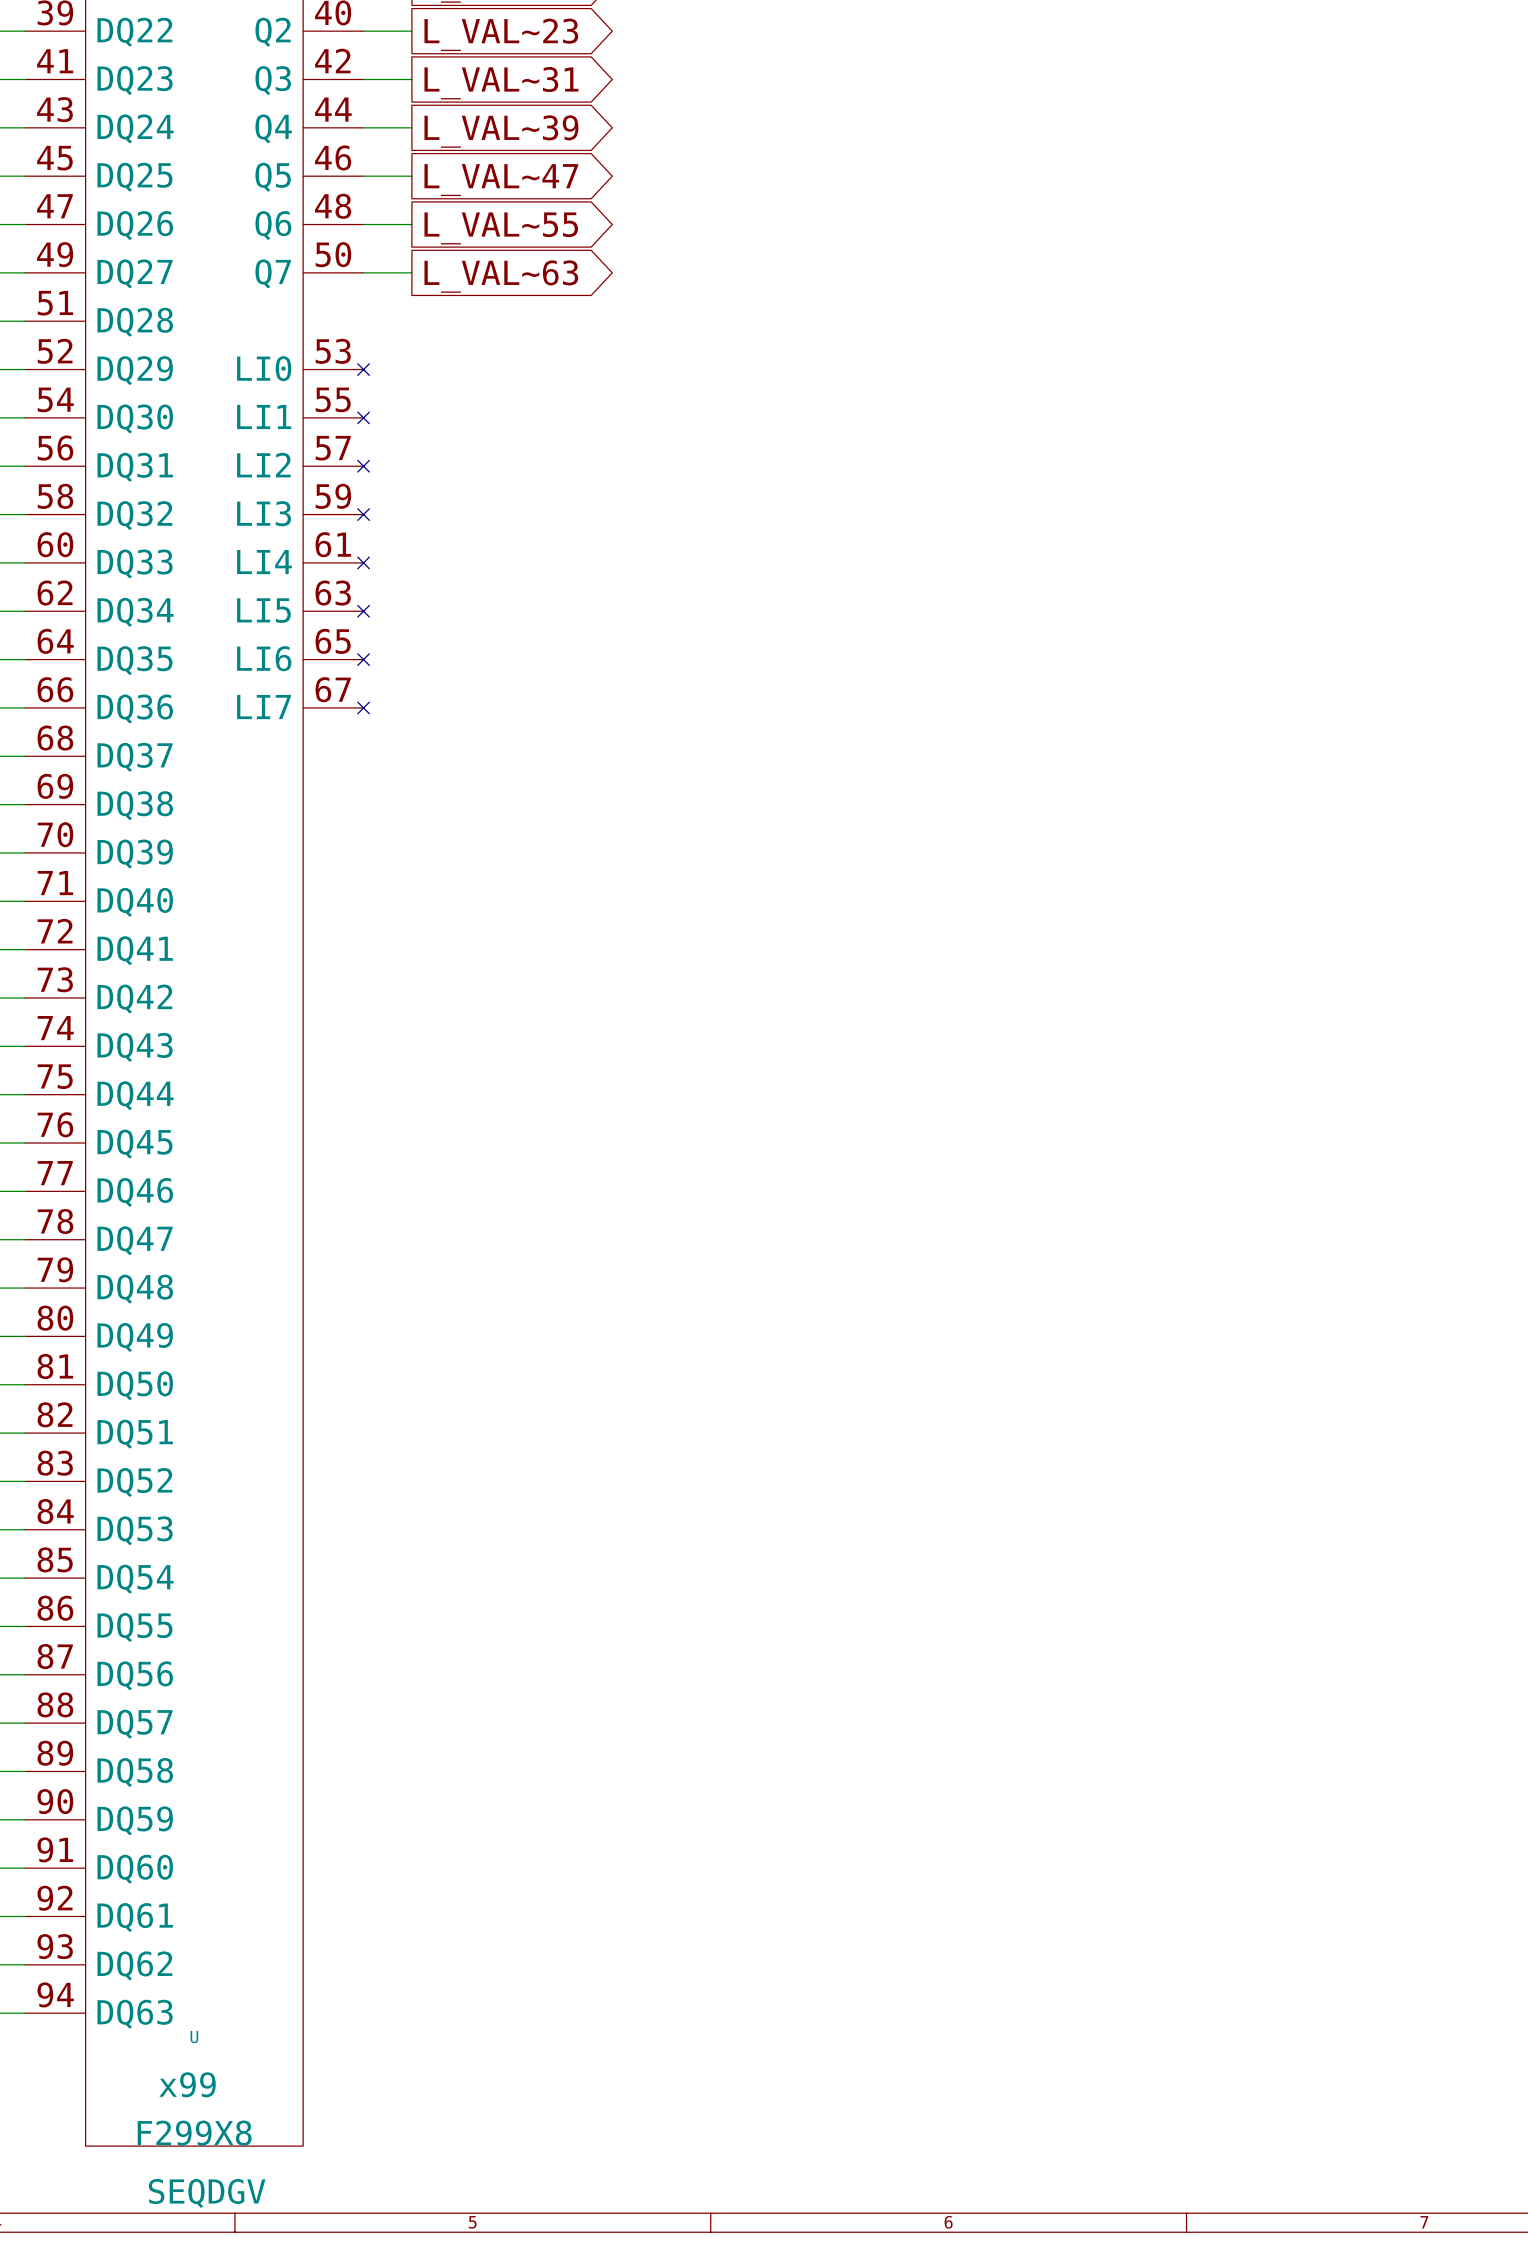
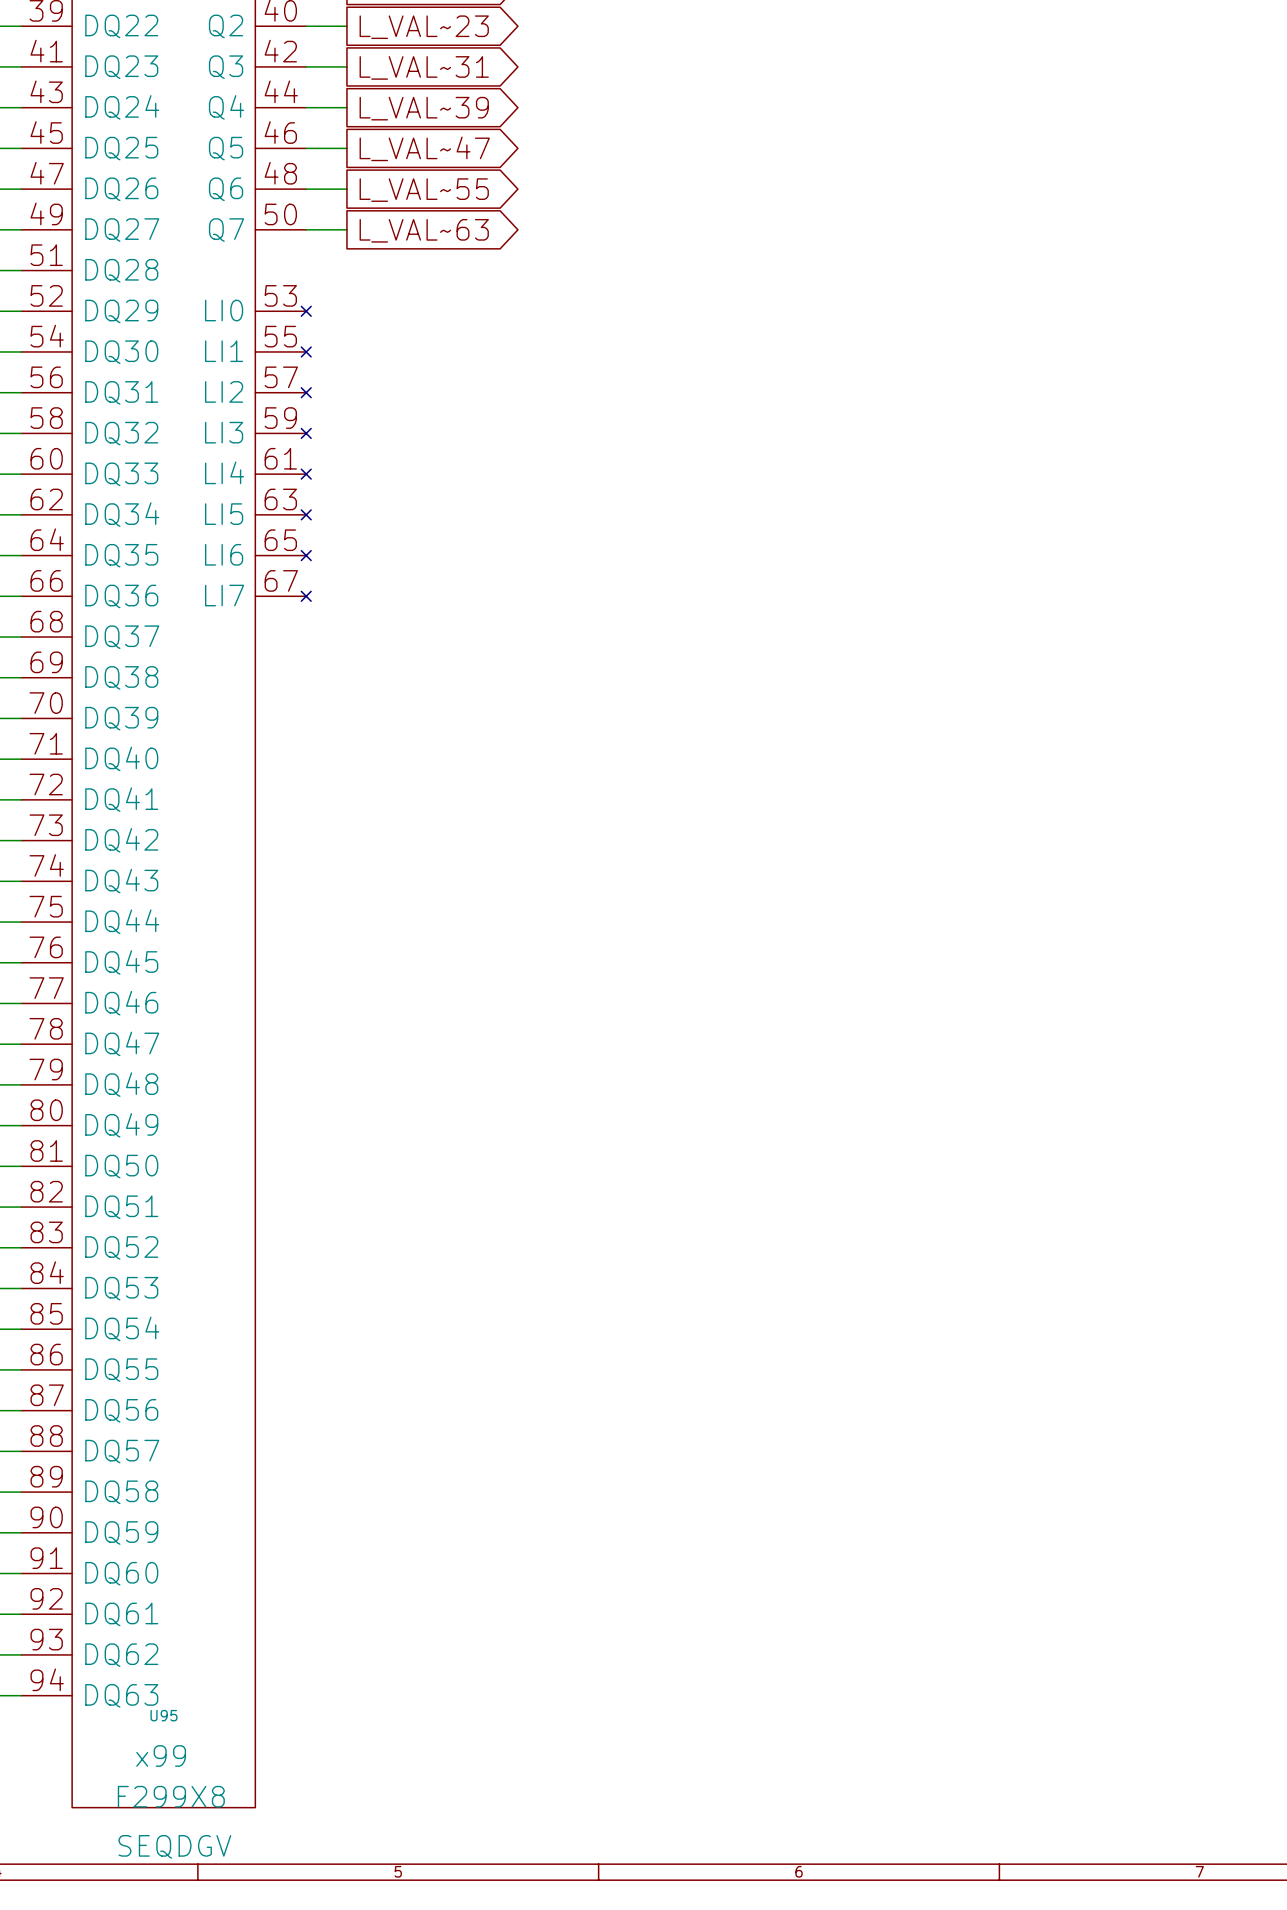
U name: U (194, 2037) -> U95 (163, 1715)

